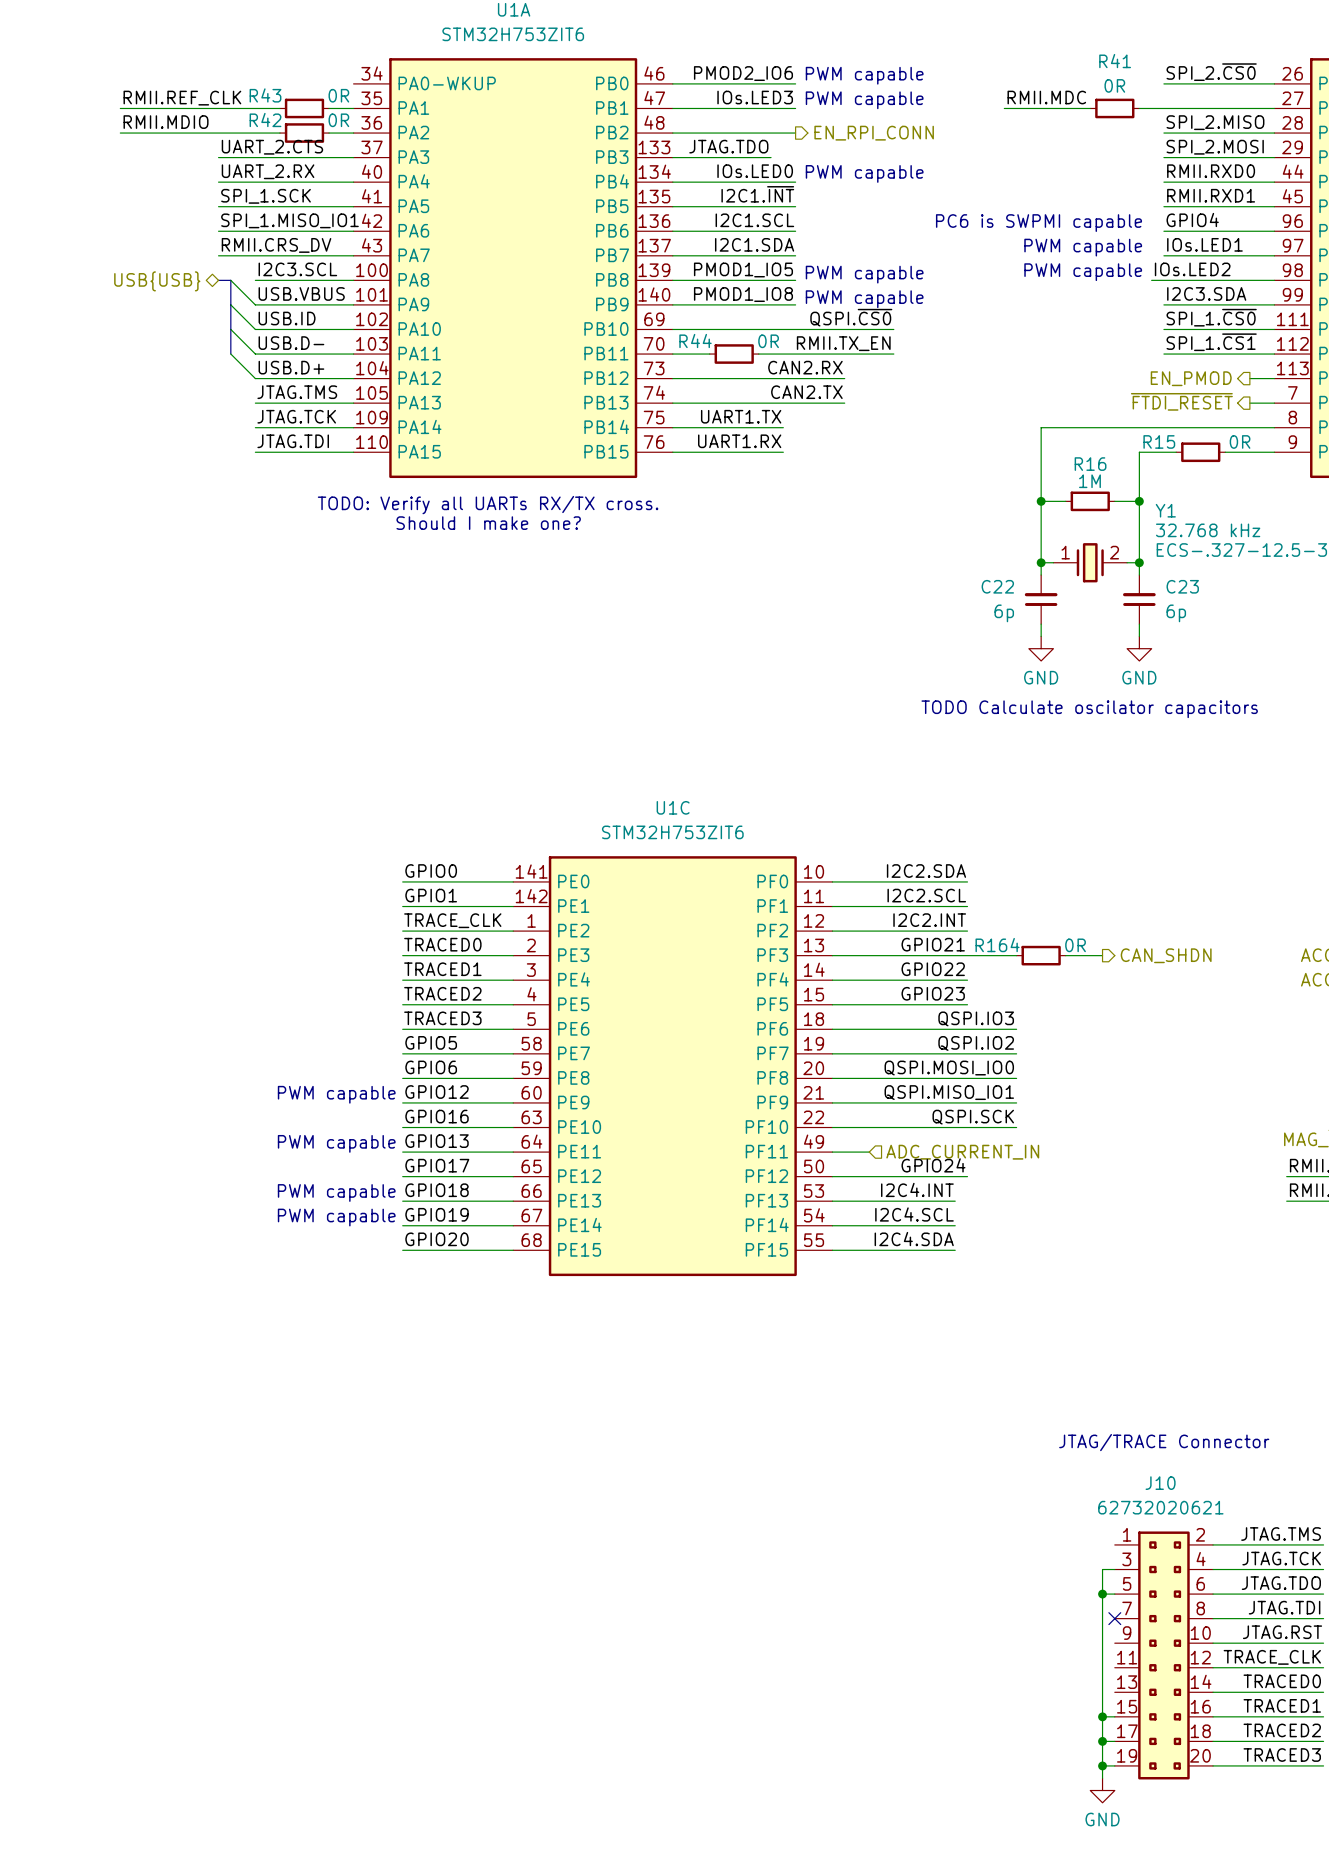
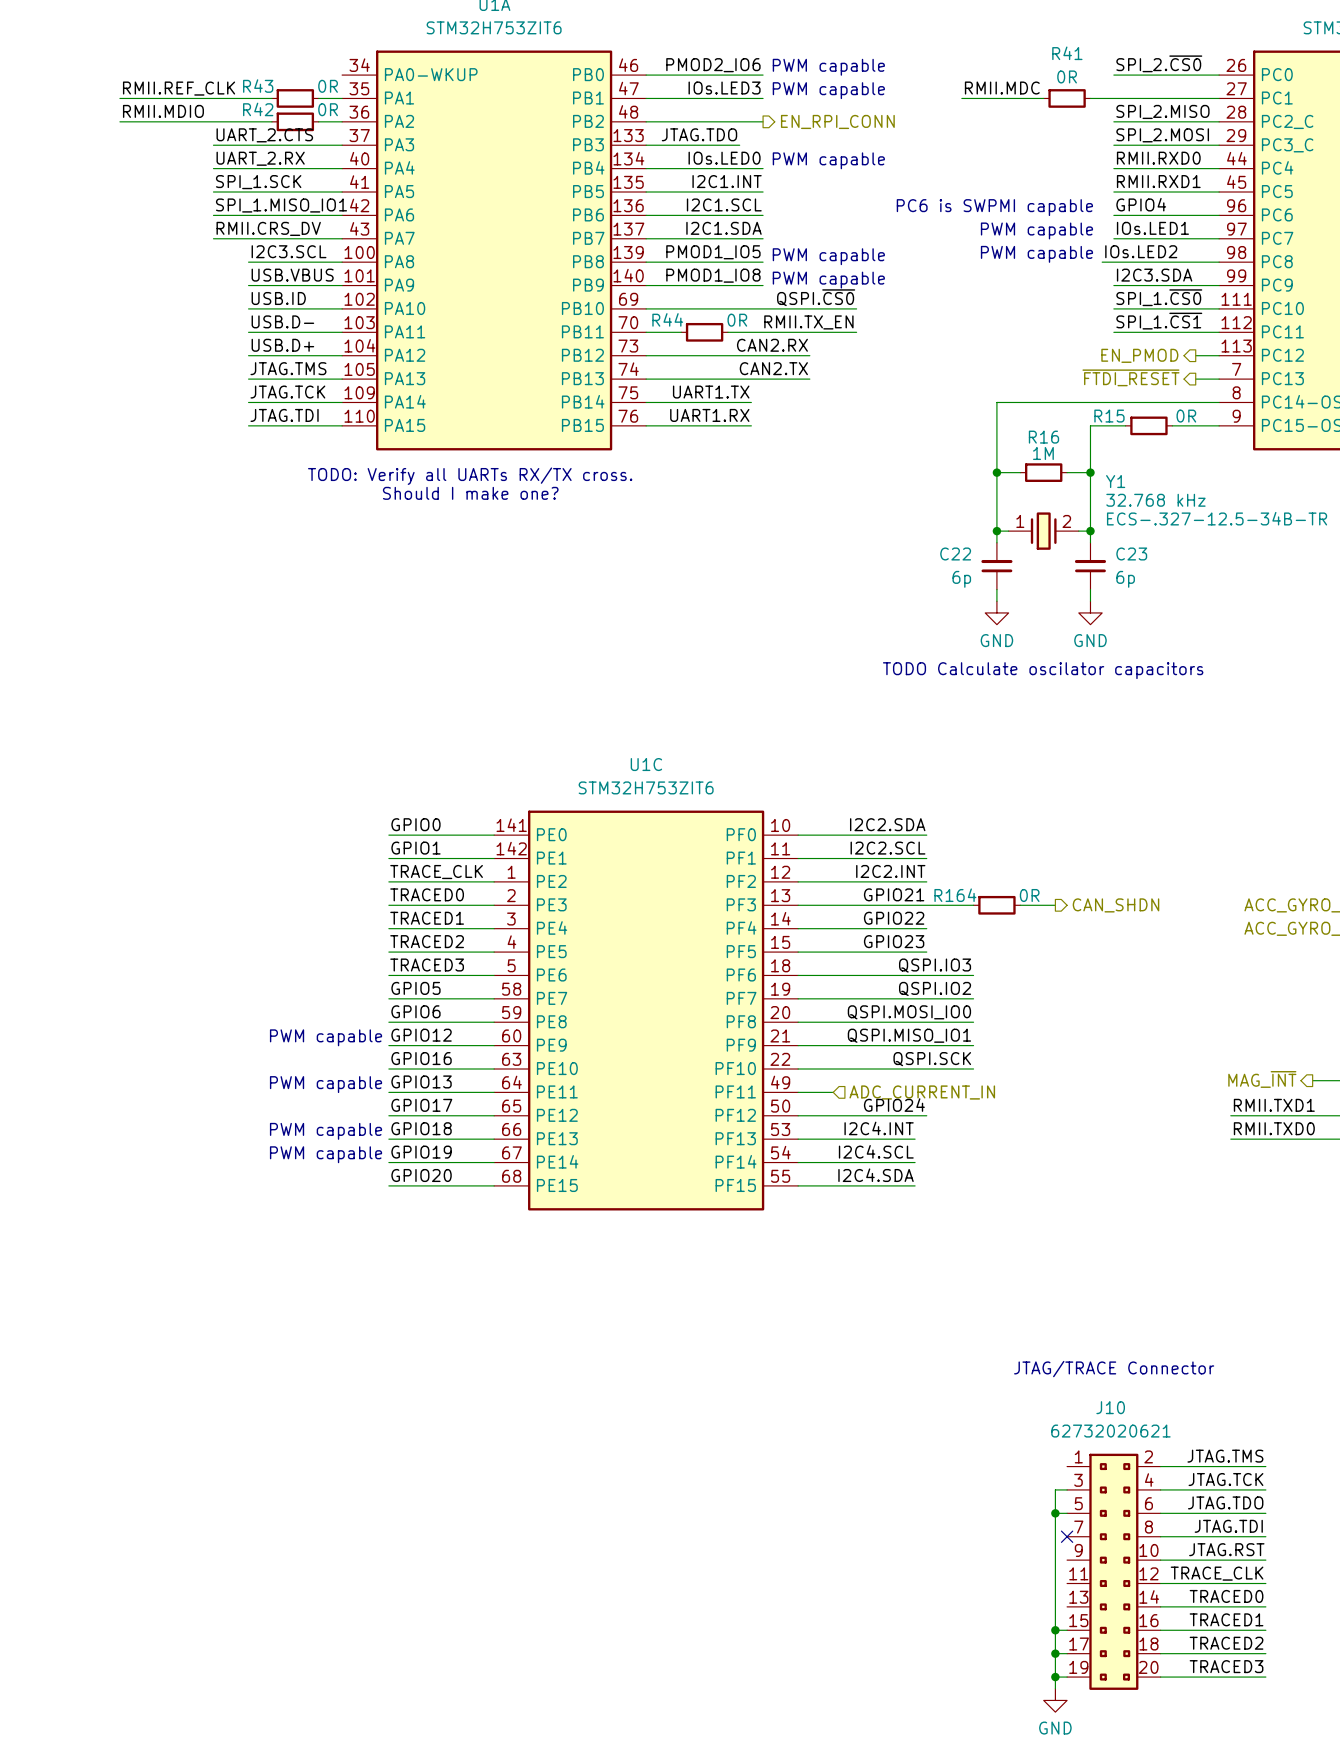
label: I2C1.~{INT} (757, 194) -> I2C1.INT (727, 181)
bus: (218, 280) (230, 280) (230, 354) -> none
wire: (230, 280) (255, 304) -> none
hierarchical label: USB{USB} (157, 281) -> none
wire: (230, 304) (255, 329) -> none
wire: (230, 329) (255, 354) -> none
wire: (230, 354) (255, 378) -> none

